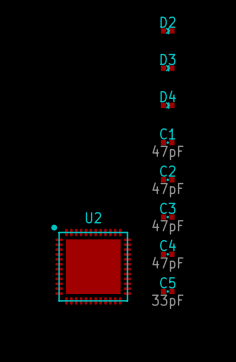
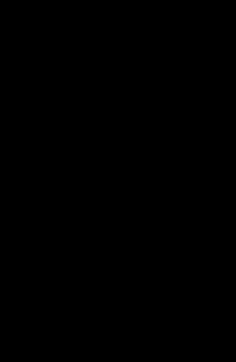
D2: (167, 31) -> none
D3: (167, 68) -> none
D4: (167, 105) -> none
C1: 47pF (167, 142) -> none
C2: 47pF (167, 179) -> none
C3: 47pF (167, 217) -> none
C4: 47pF (167, 254) -> none
U2: (91, 264) -> none
C5: 33pF (167, 291) -> none

